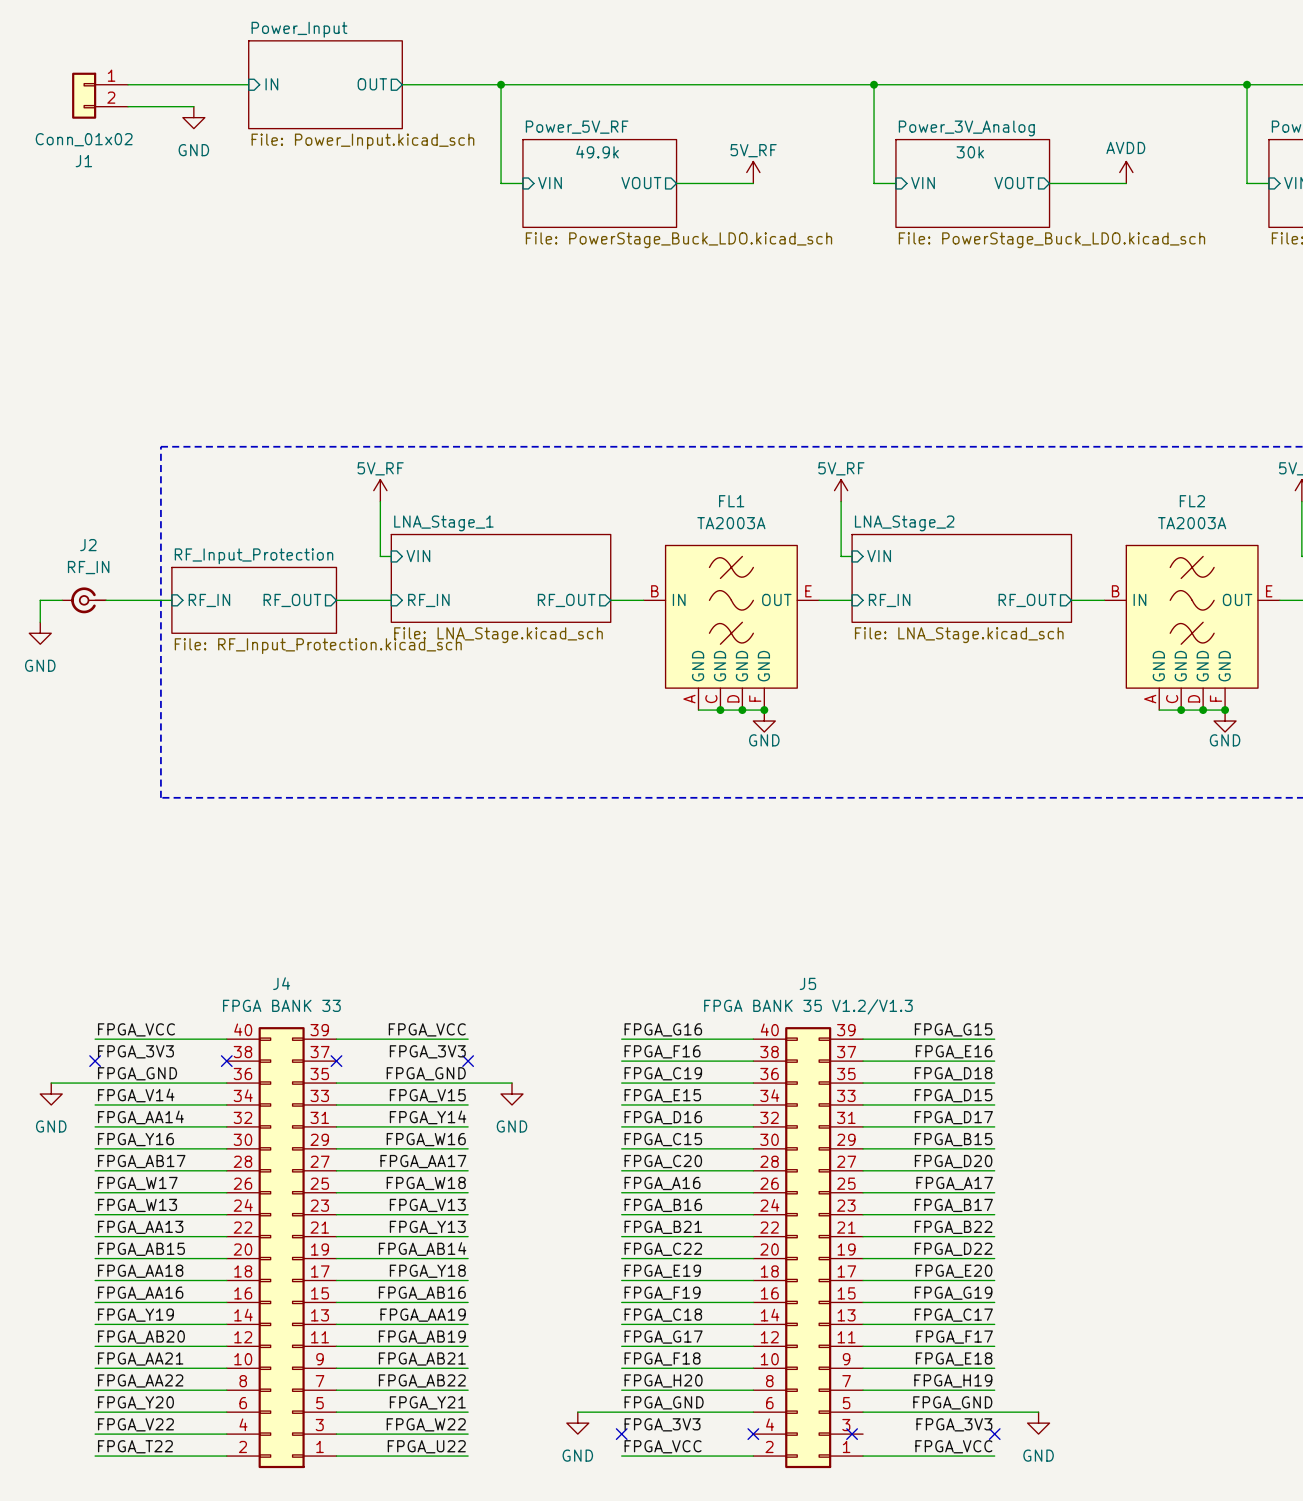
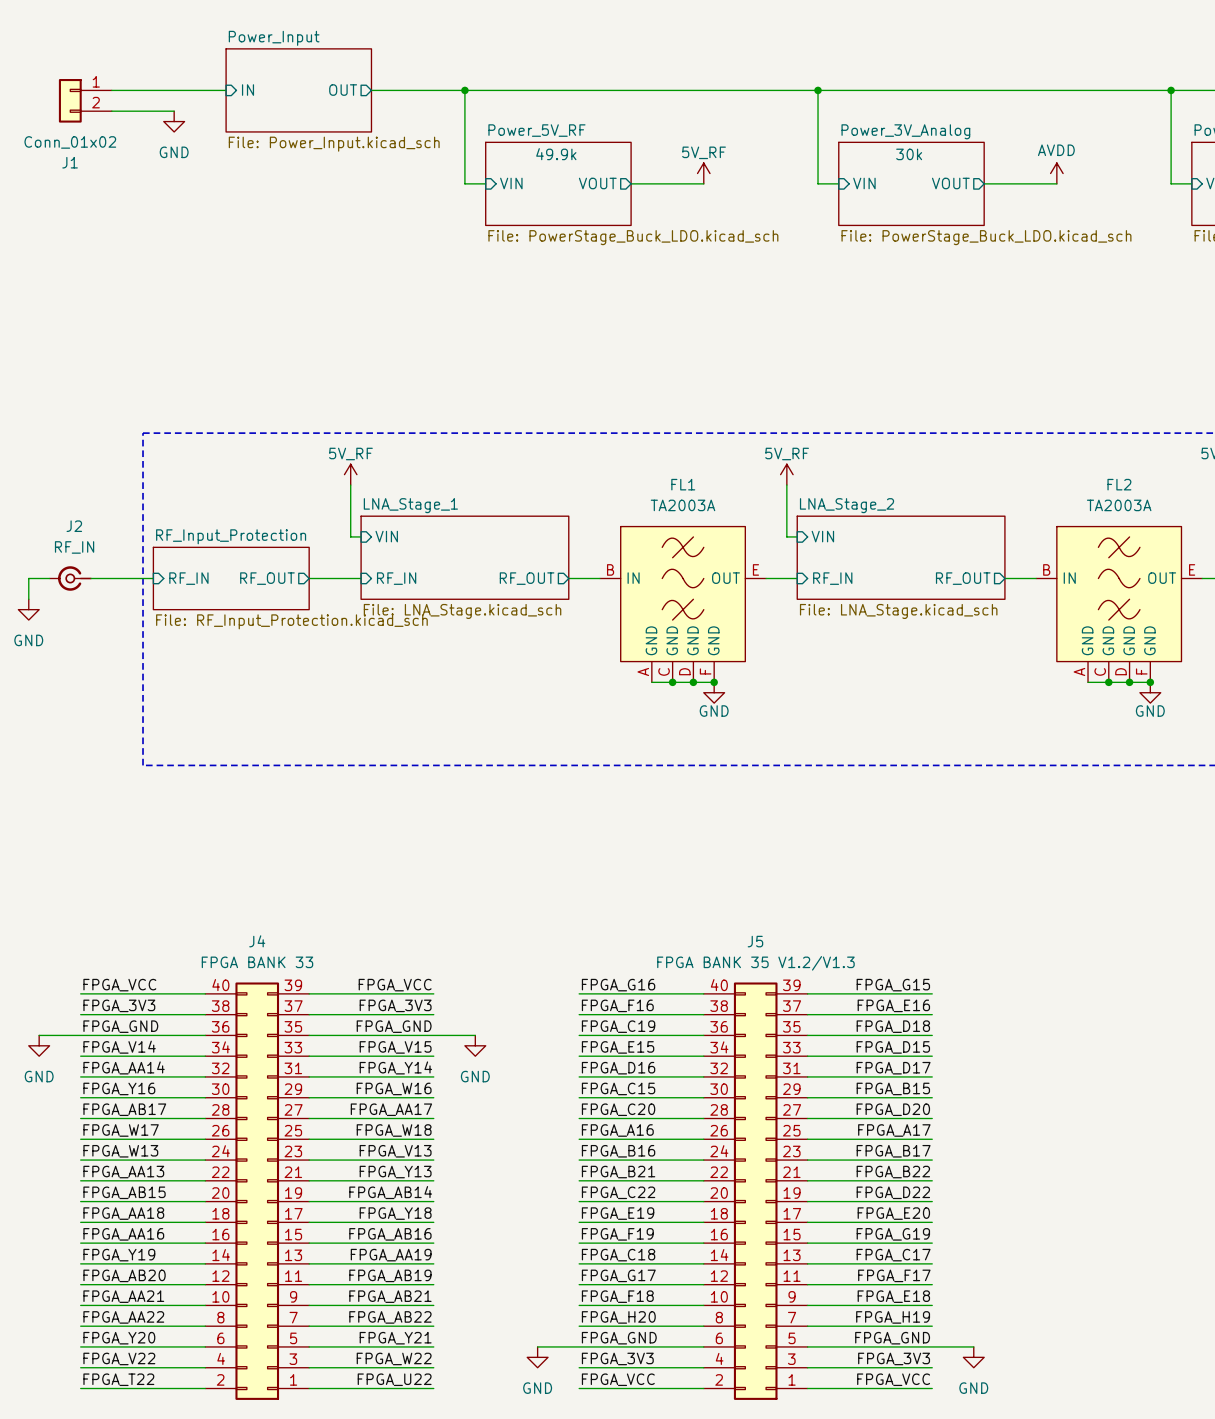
wire: none -> (80, 1014) (205, 1014)
no-connect mark: (95, 1061) -> none
no-connect mark: (226, 1061) -> none
wire: none -> (309, 1014) (433, 1014)
no-connect mark: (336, 1061) -> none
no-connect mark: (468, 1061) -> none
wire: none -> (579, 1367) (703, 1367)
no-connect mark: (621, 1434) -> none
no-connect mark: (753, 1434) -> none
no-connect mark: (852, 1434) -> none
wire: none -> (807, 1367) (932, 1367)
no-connect mark: (994, 1434) -> none

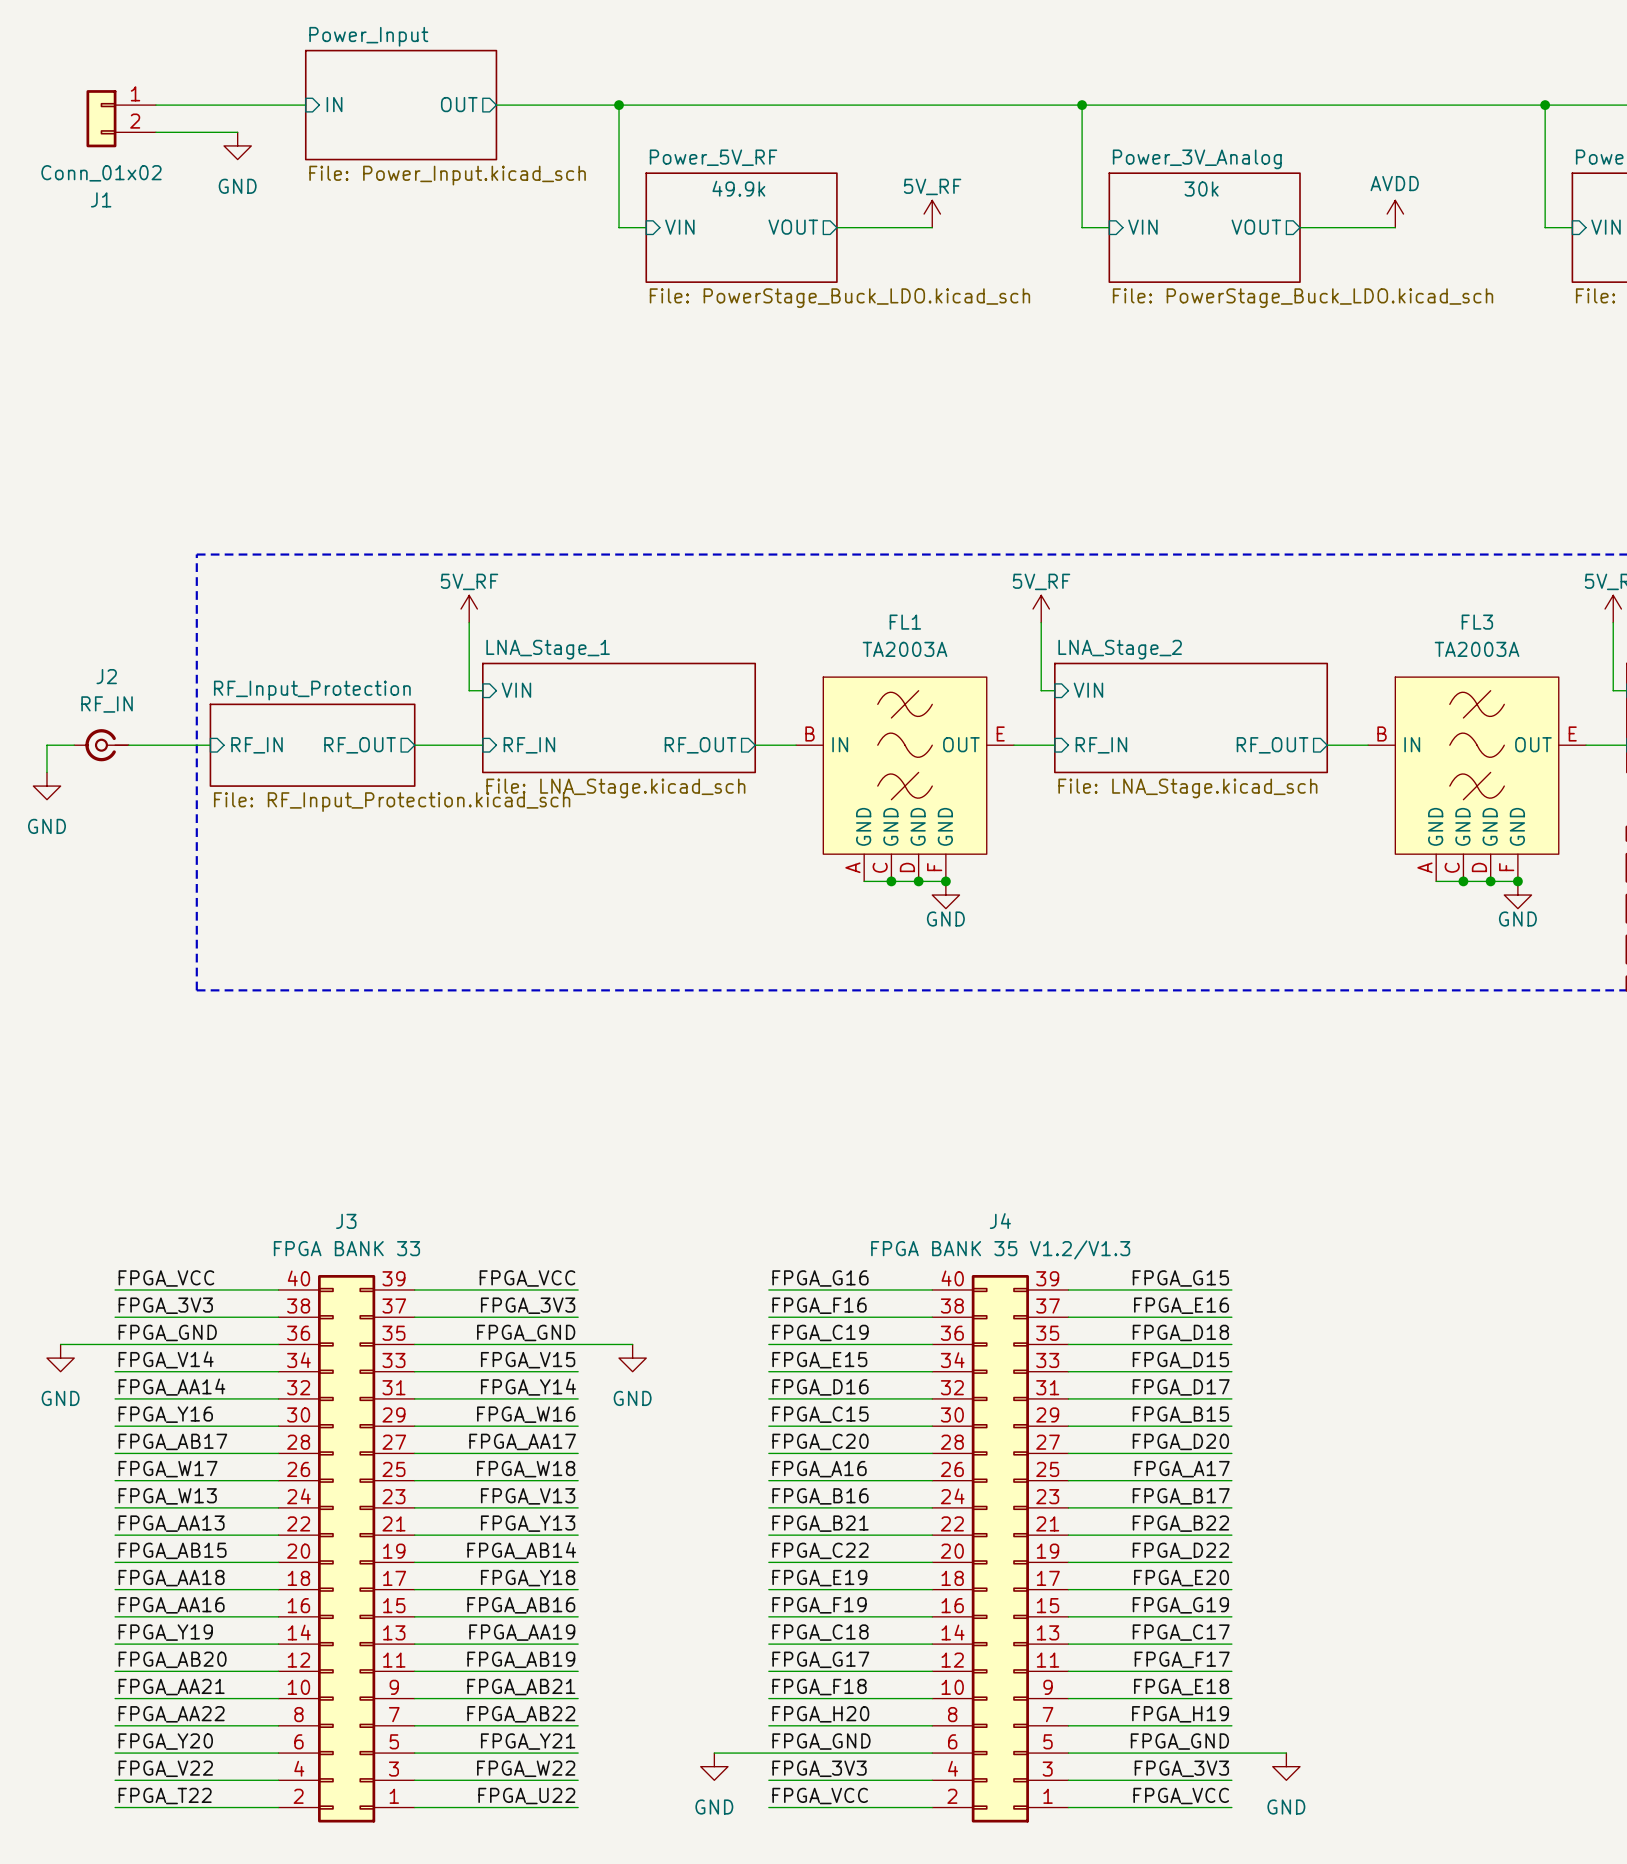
FL2 name: FL2 (1119, 484) -> FL3 (1477, 622)
J4 name: J4 (257, 941) -> J3 (346, 1221)
J5 name: J5 (755, 941) -> J4 (1000, 1221)

